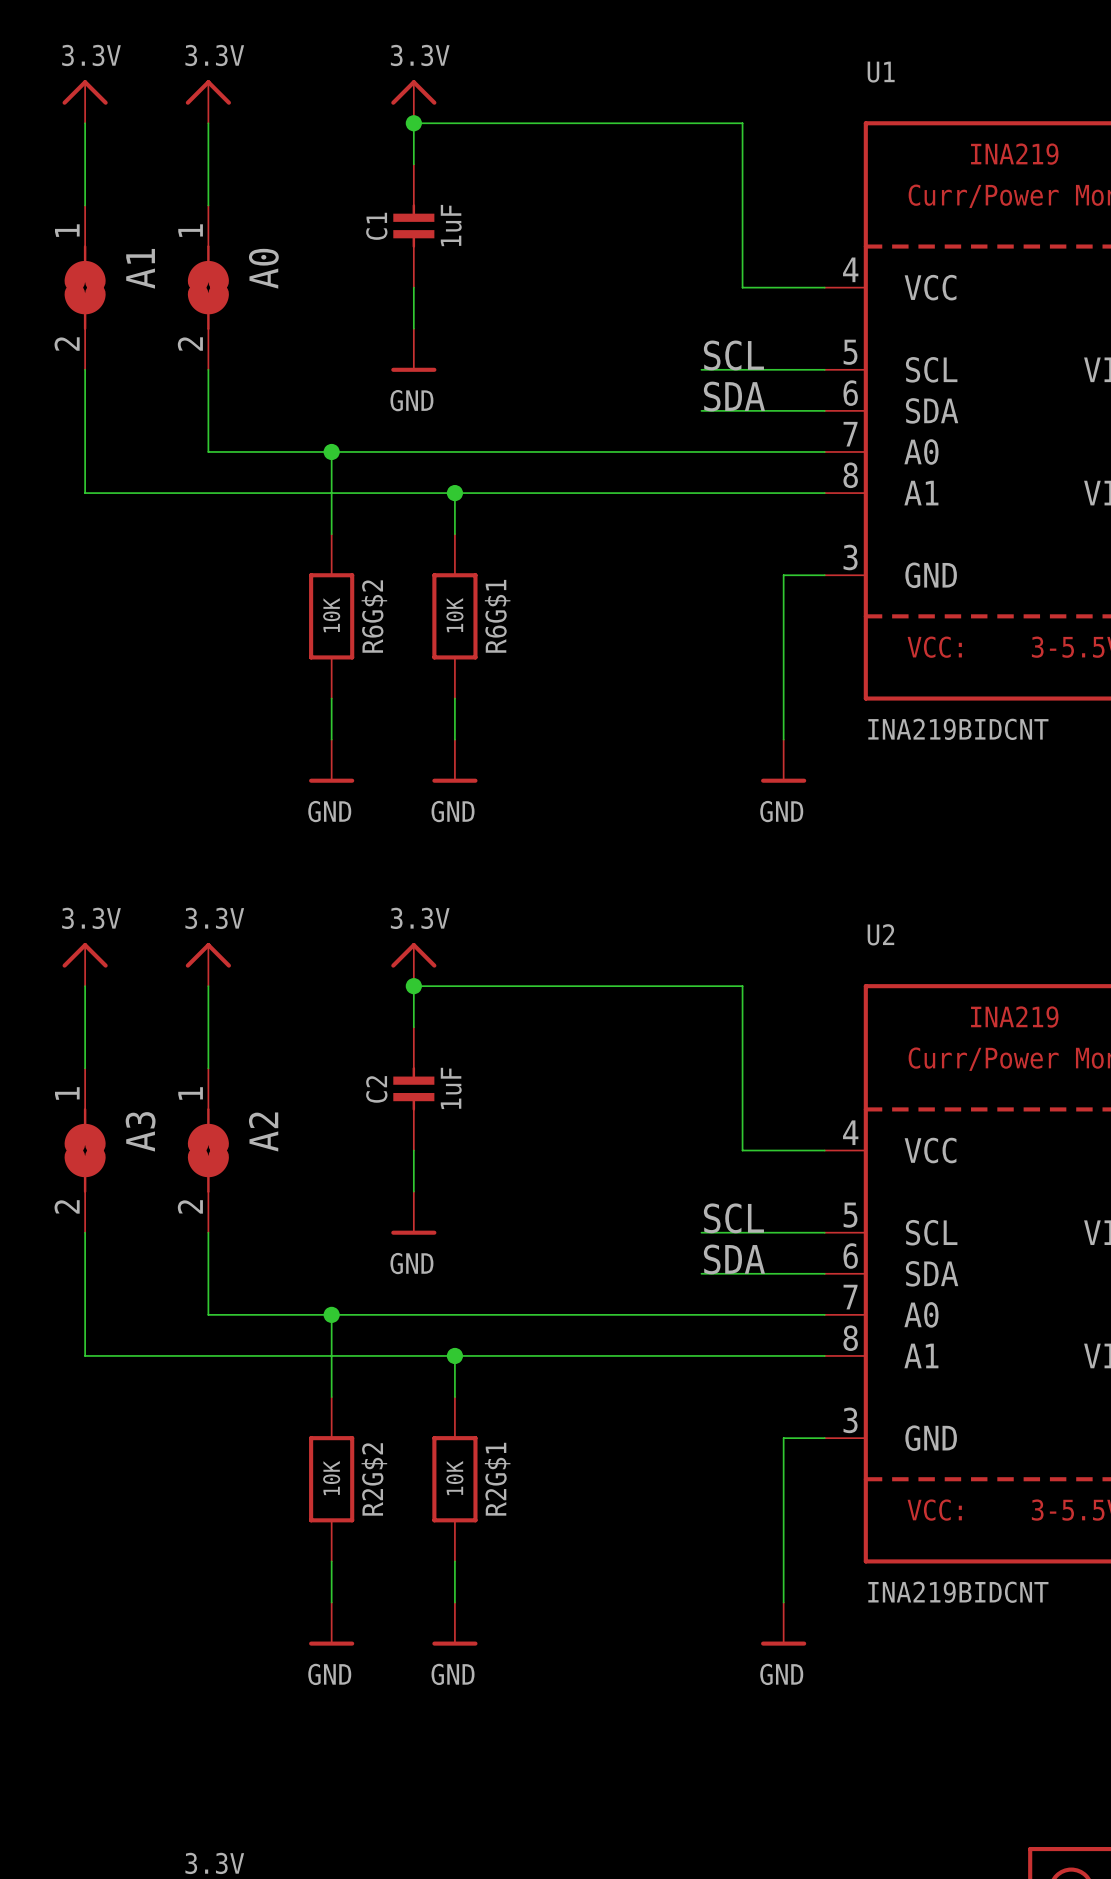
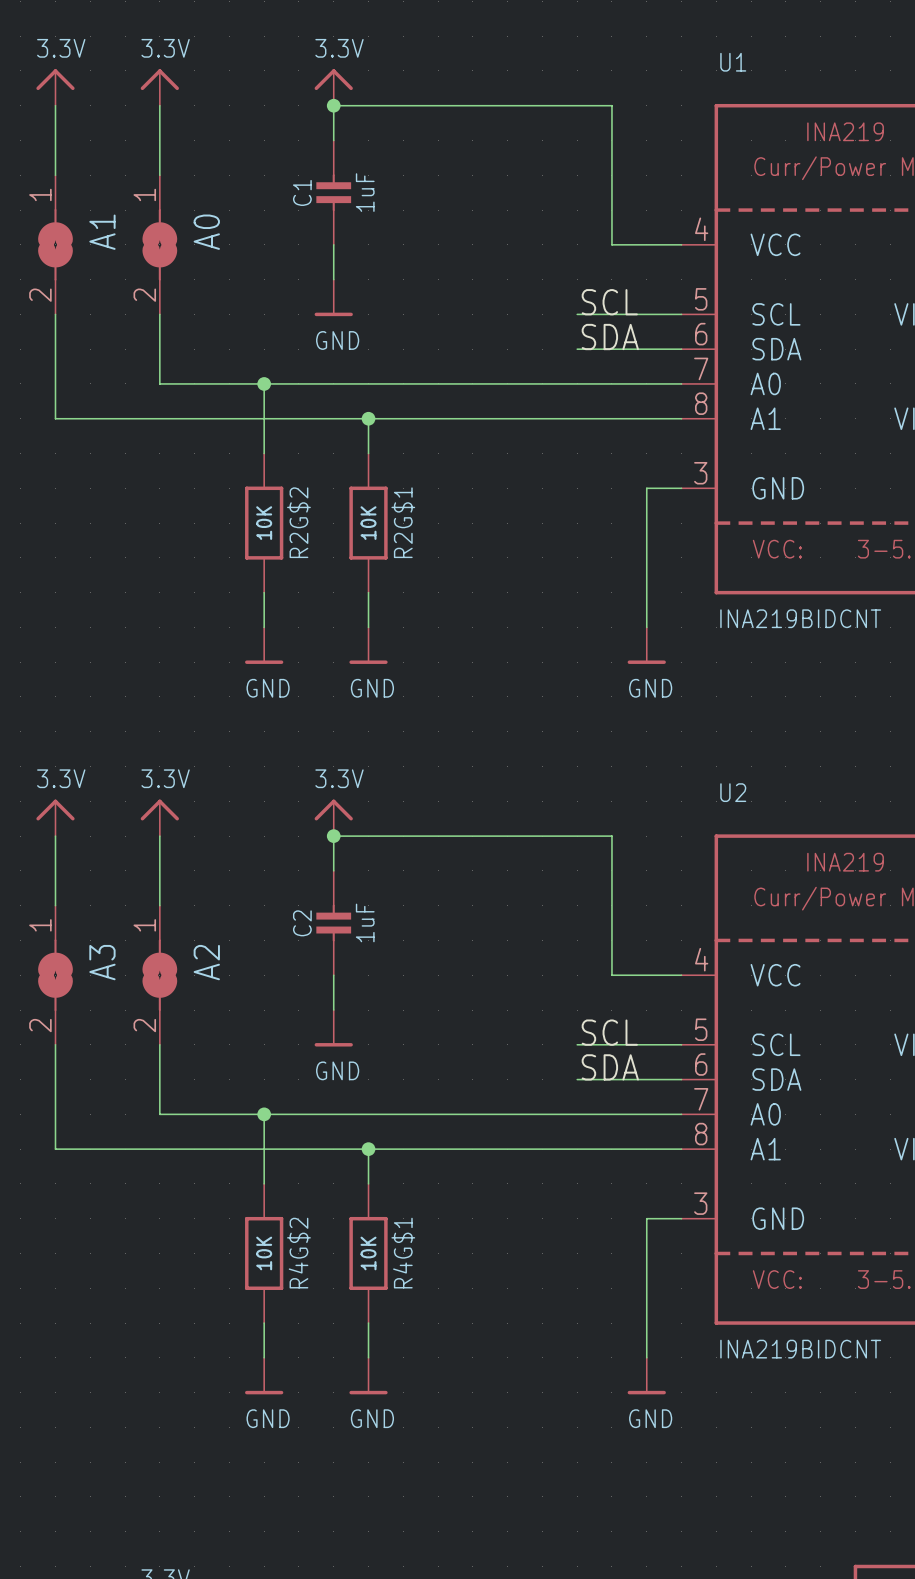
R6G$2 name: R6G$2 (374, 616) -> R2G$2 (298, 522)
R6G$1 name: R6G$1 (497, 616) -> R2G$1 (403, 522)
R2G$2 name: R2G$2 (374, 1479) -> R4G$2 (298, 1253)
R2G$1 name: R2G$1 (497, 1479) -> R4G$1 (403, 1253)

